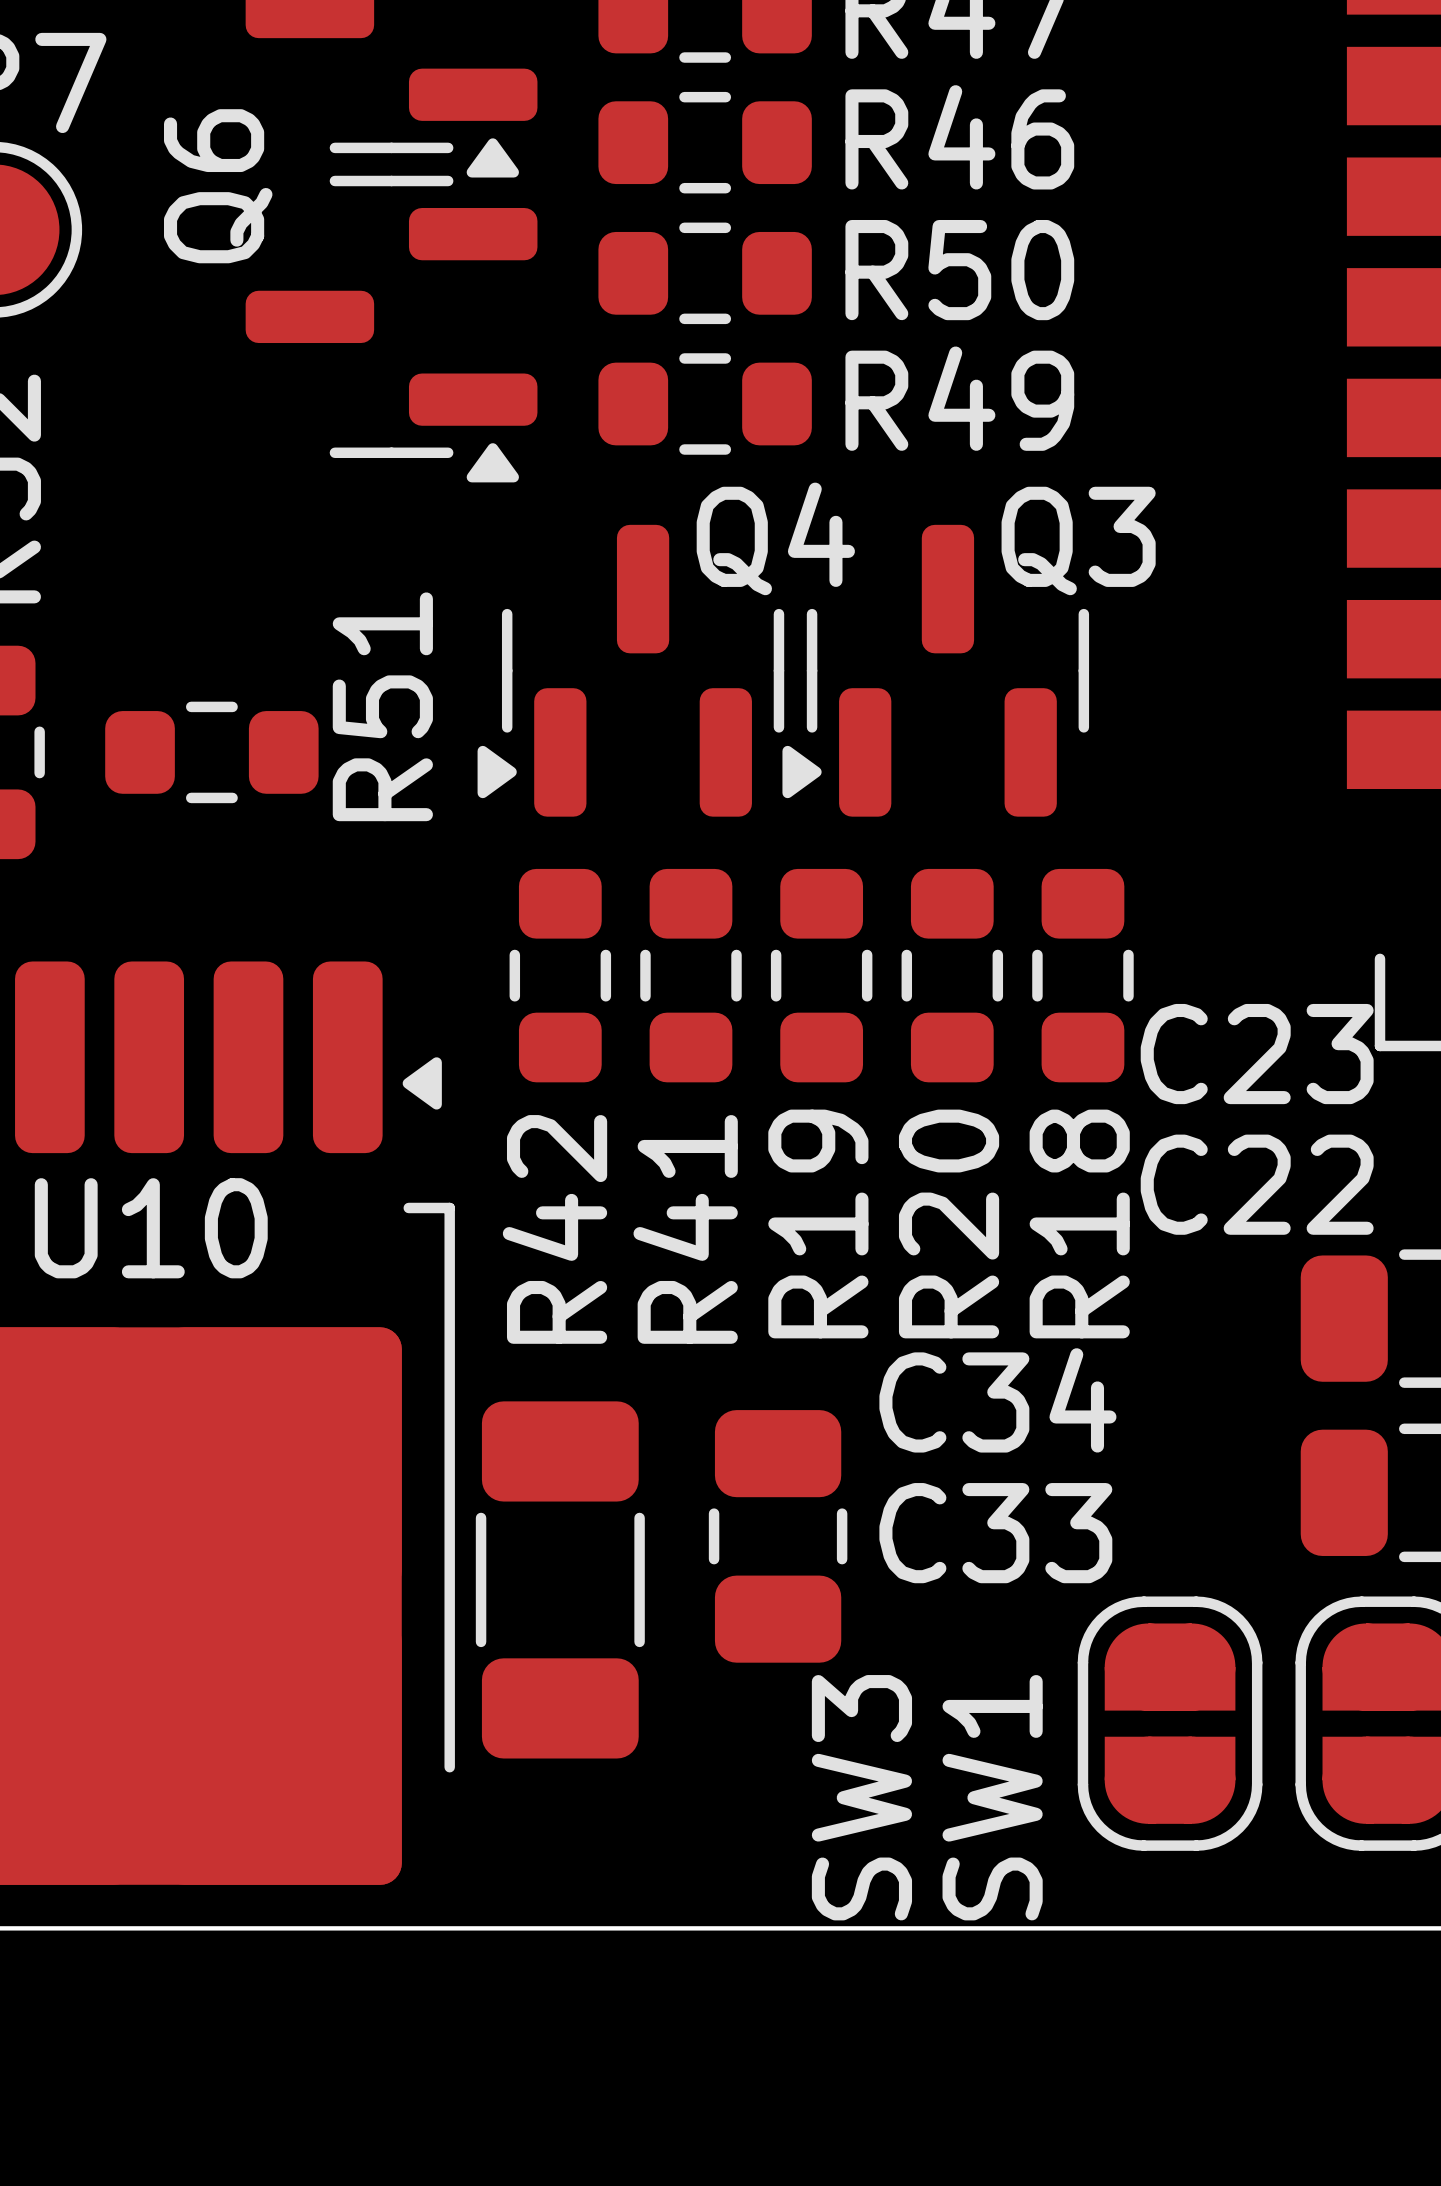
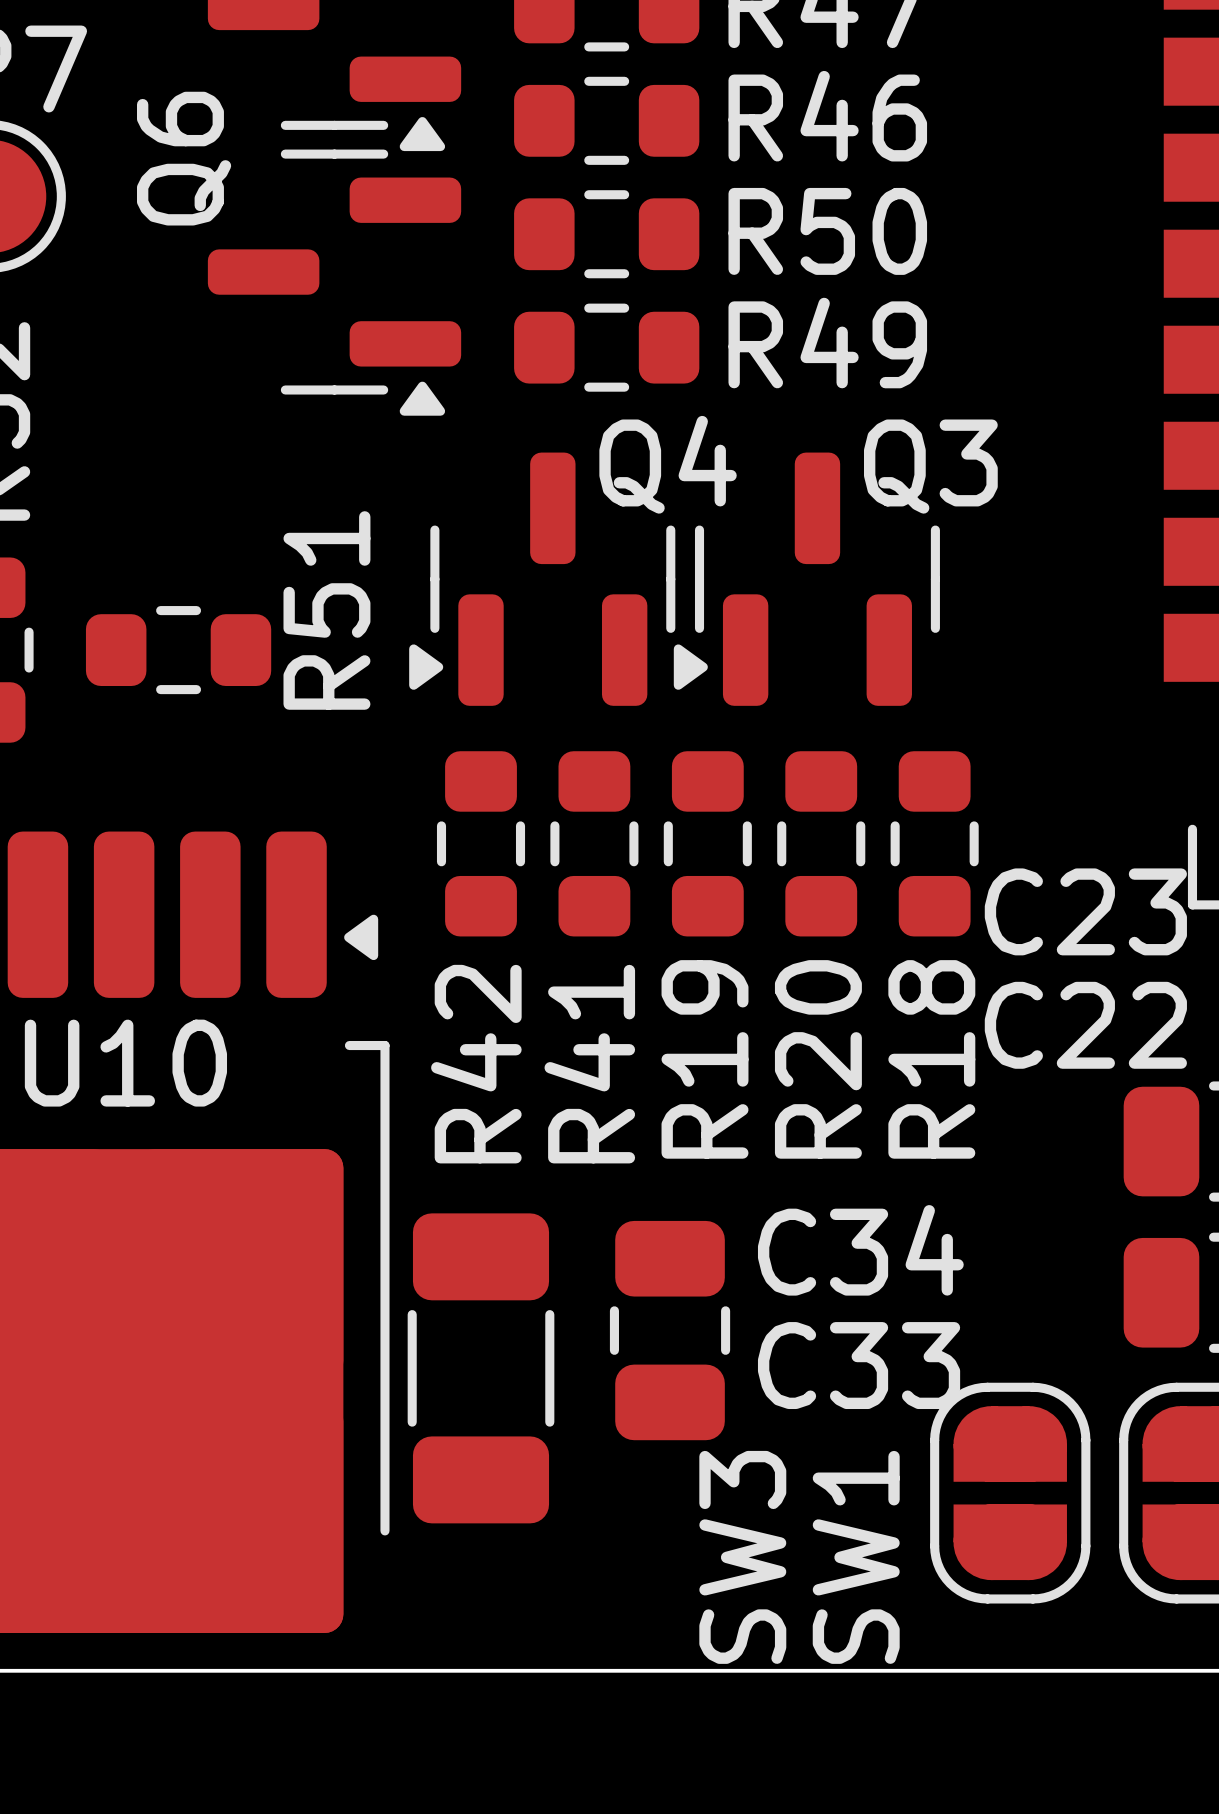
C34 name position: C34 (997, 1400) -> C34 (860, 1250)
C33 name position: C33 (995, 1533) -> C33 (859, 1365)

